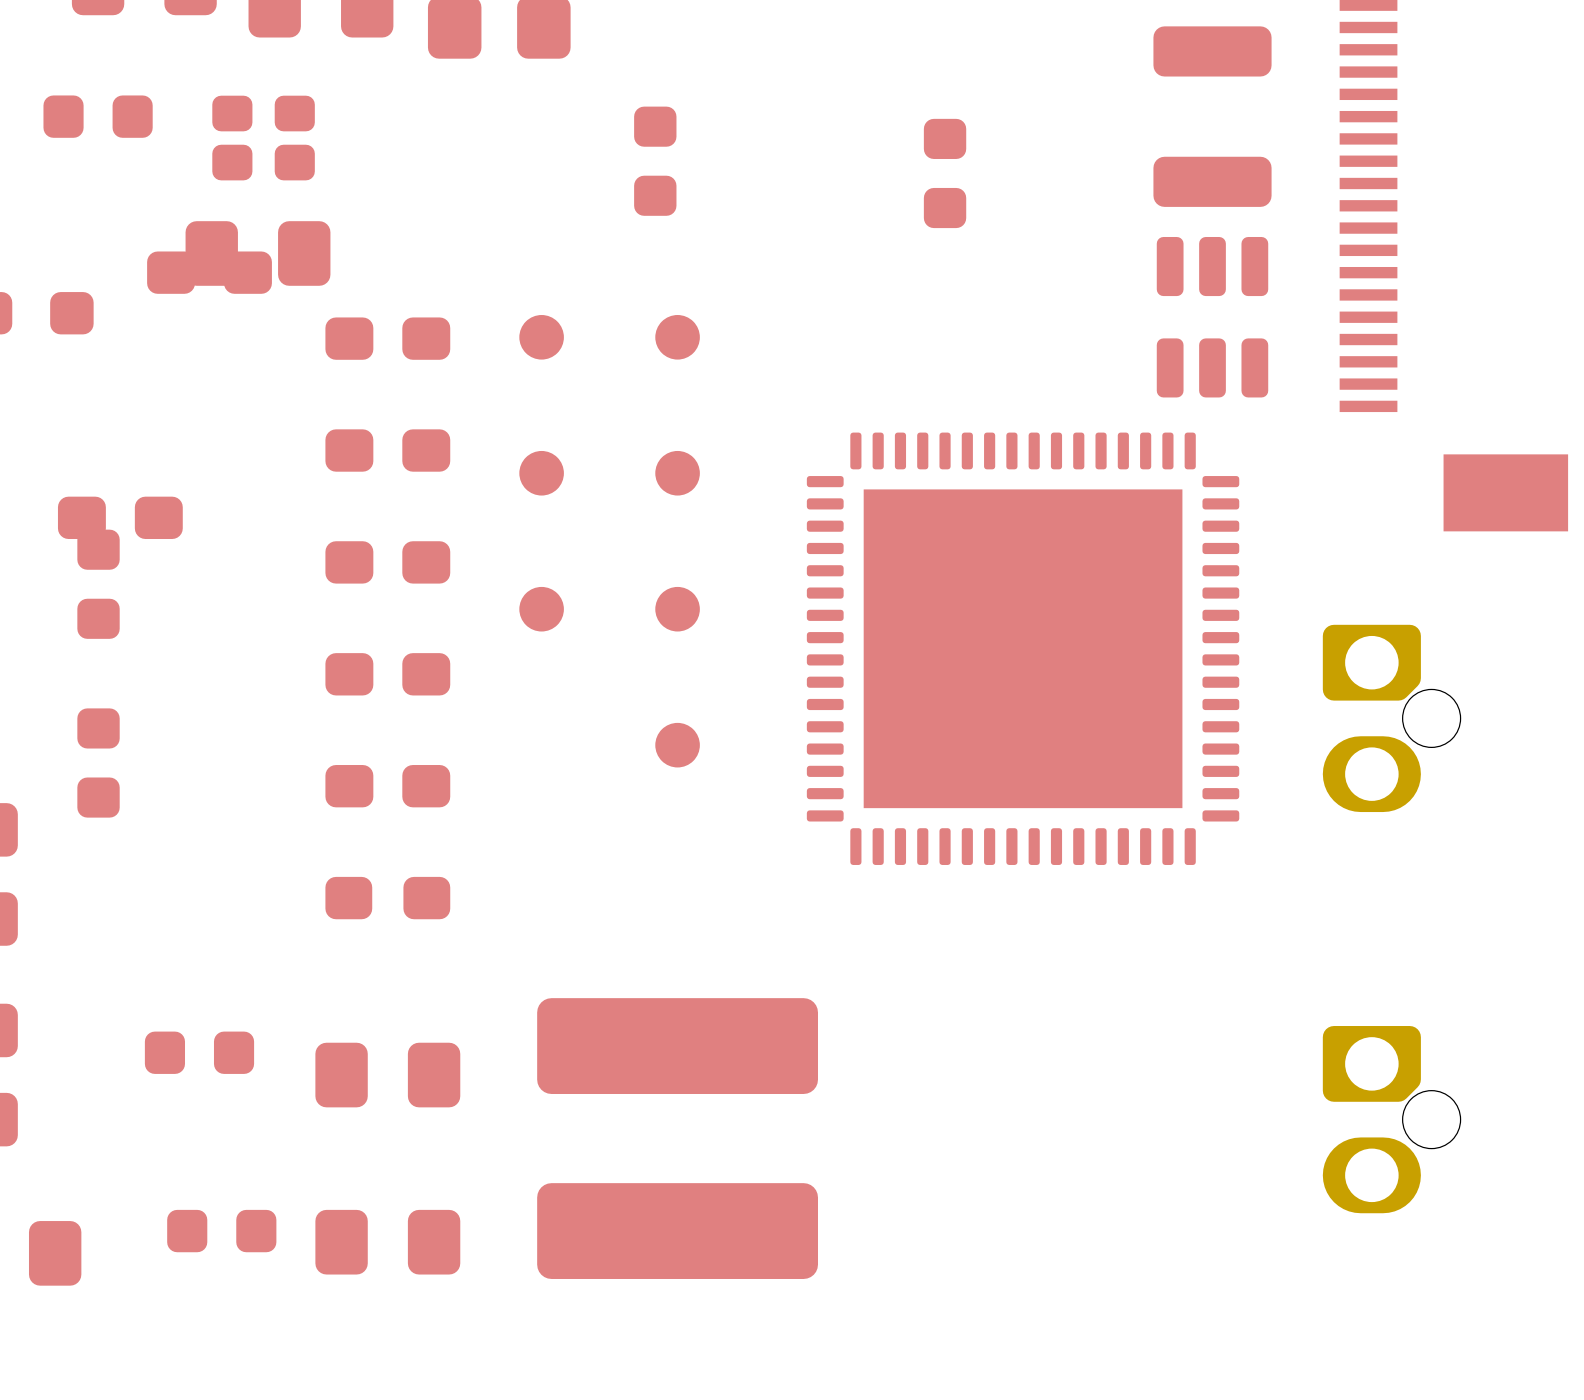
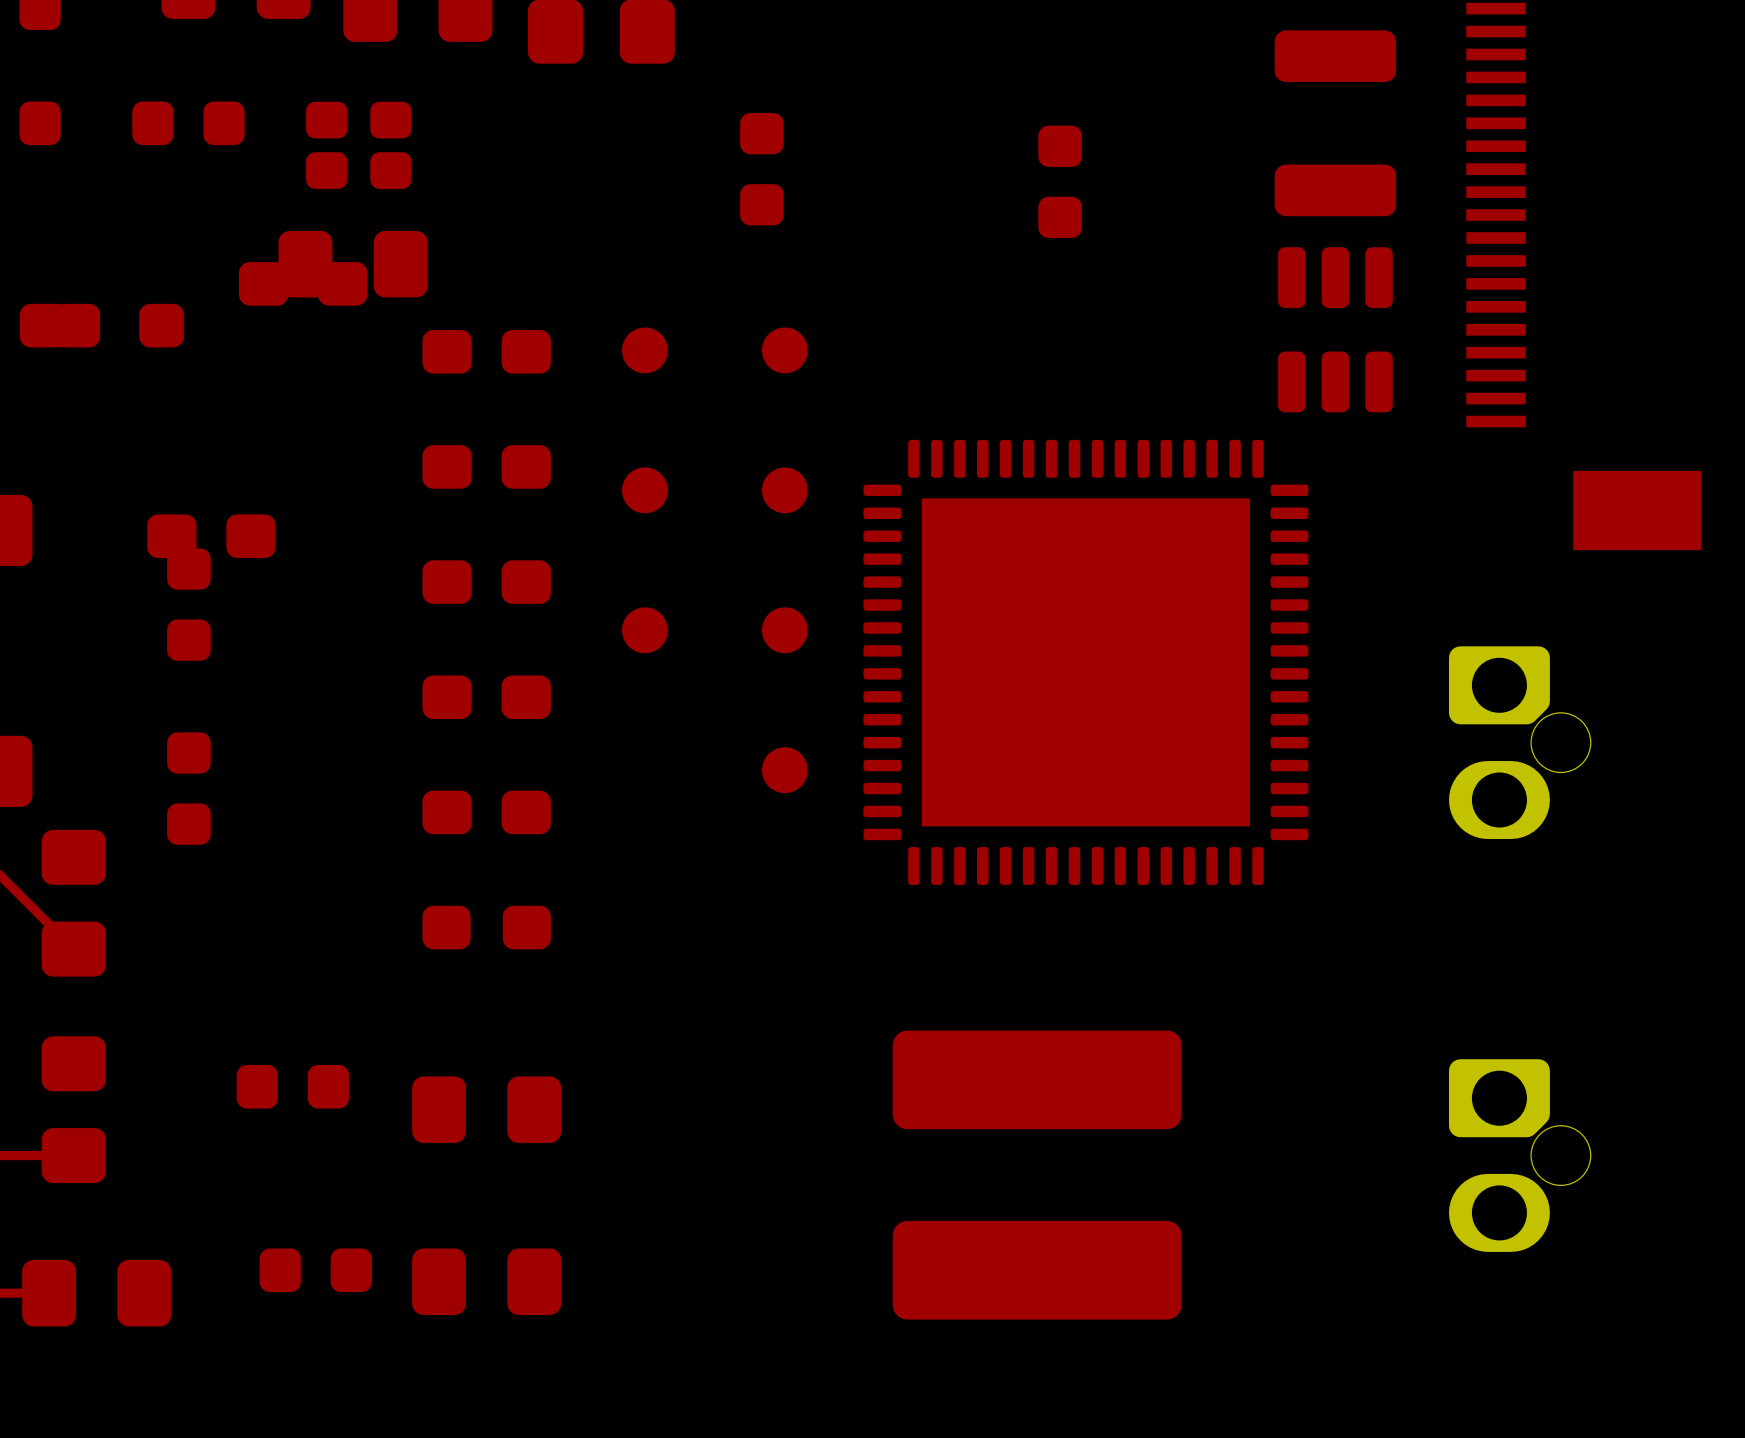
part position: (1023, 648) -> (1085, 662)
part position: (677, 1138) -> (1037, 1175)

